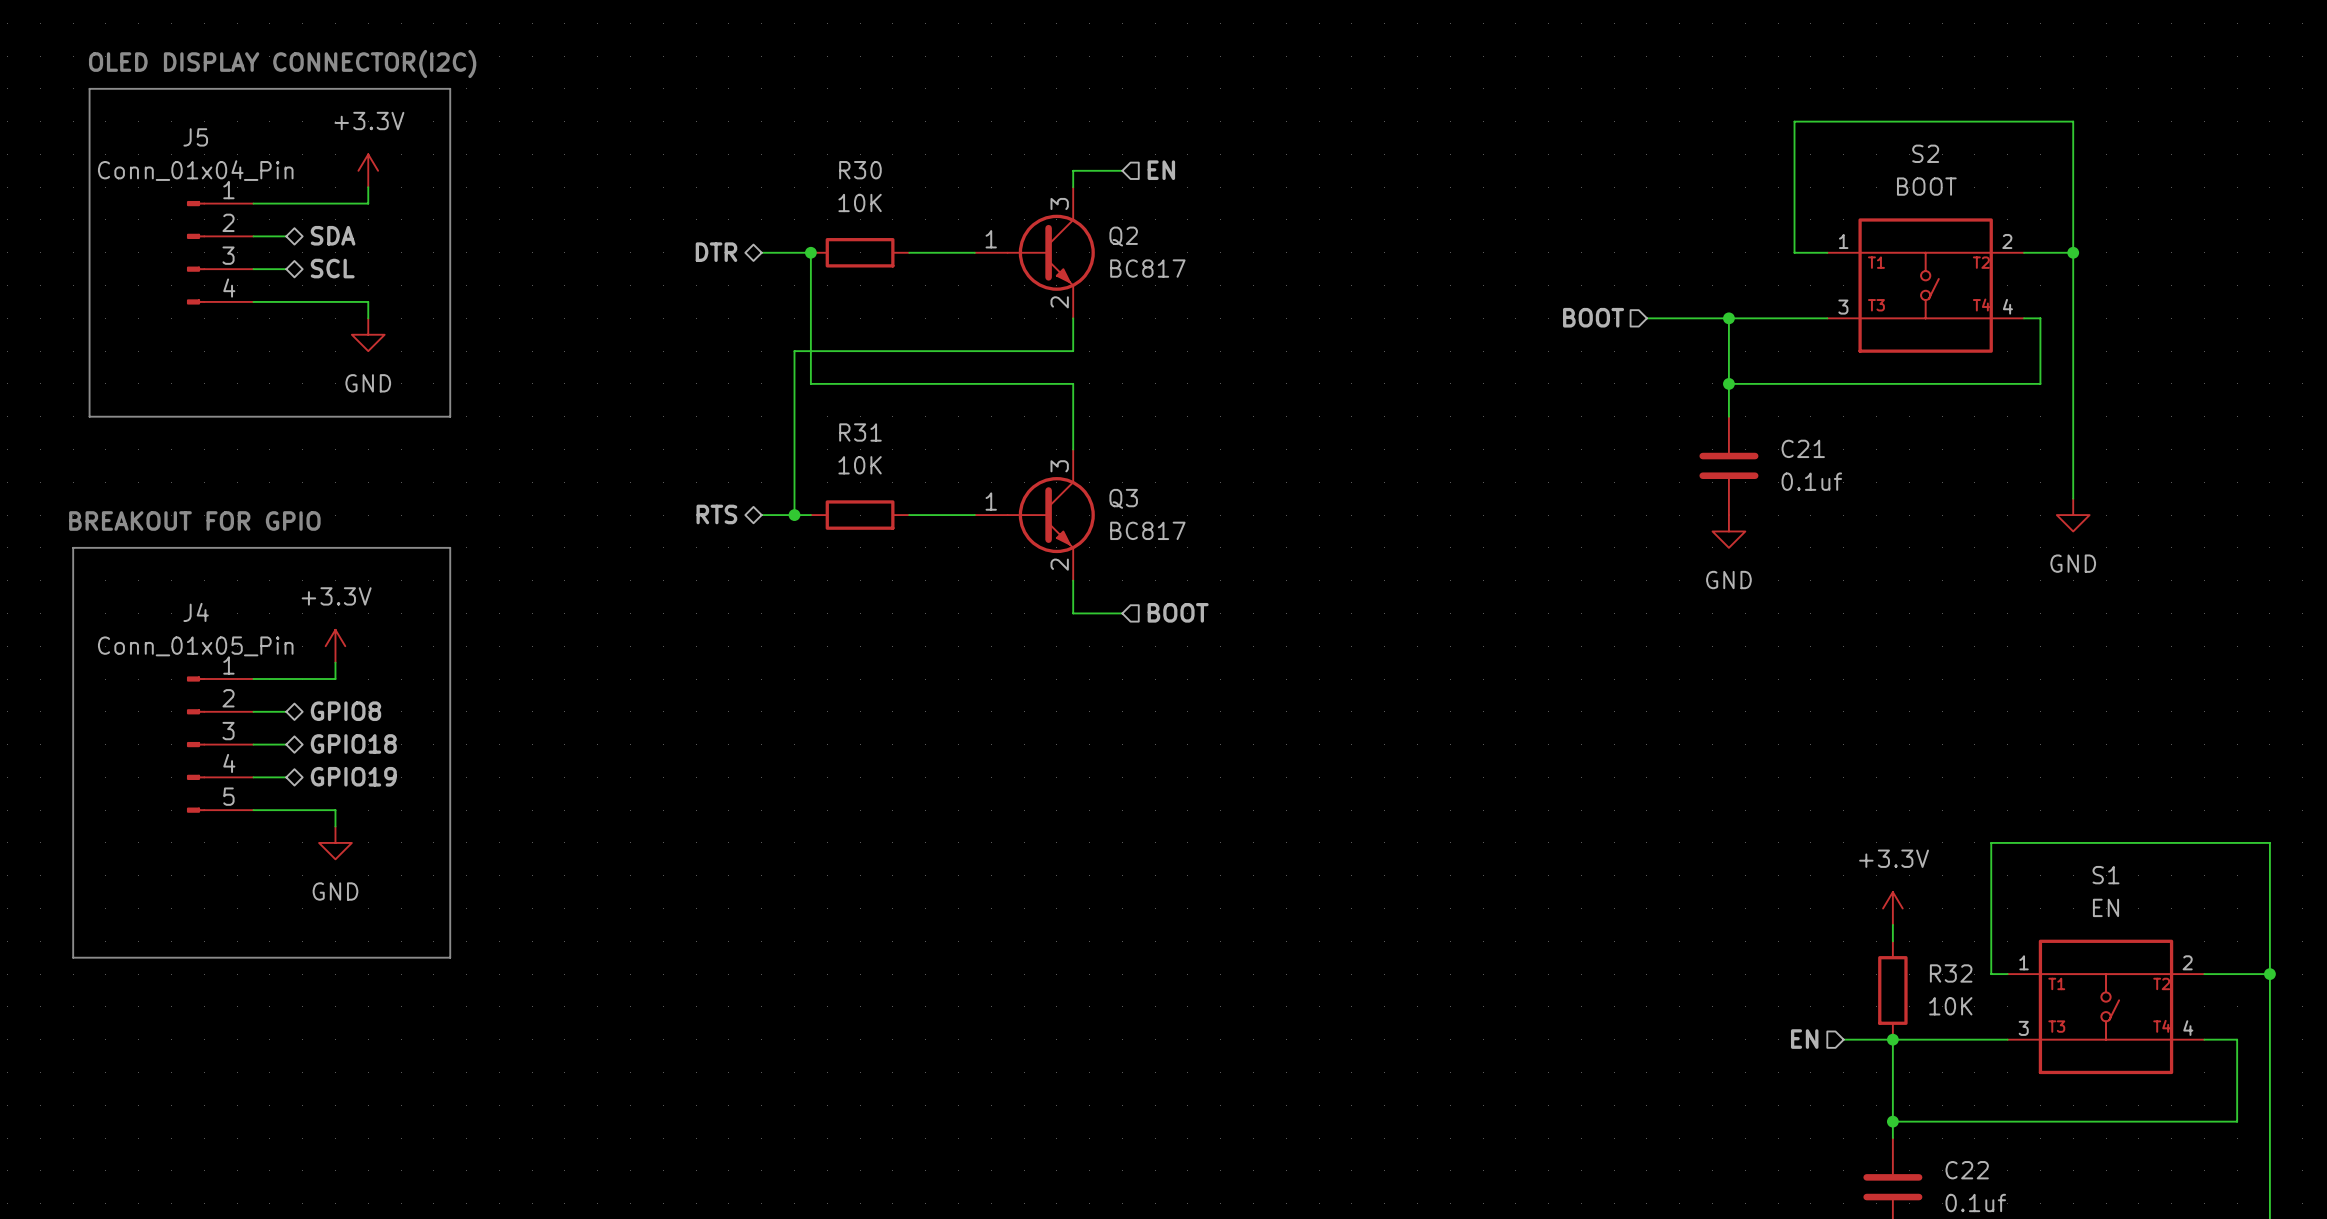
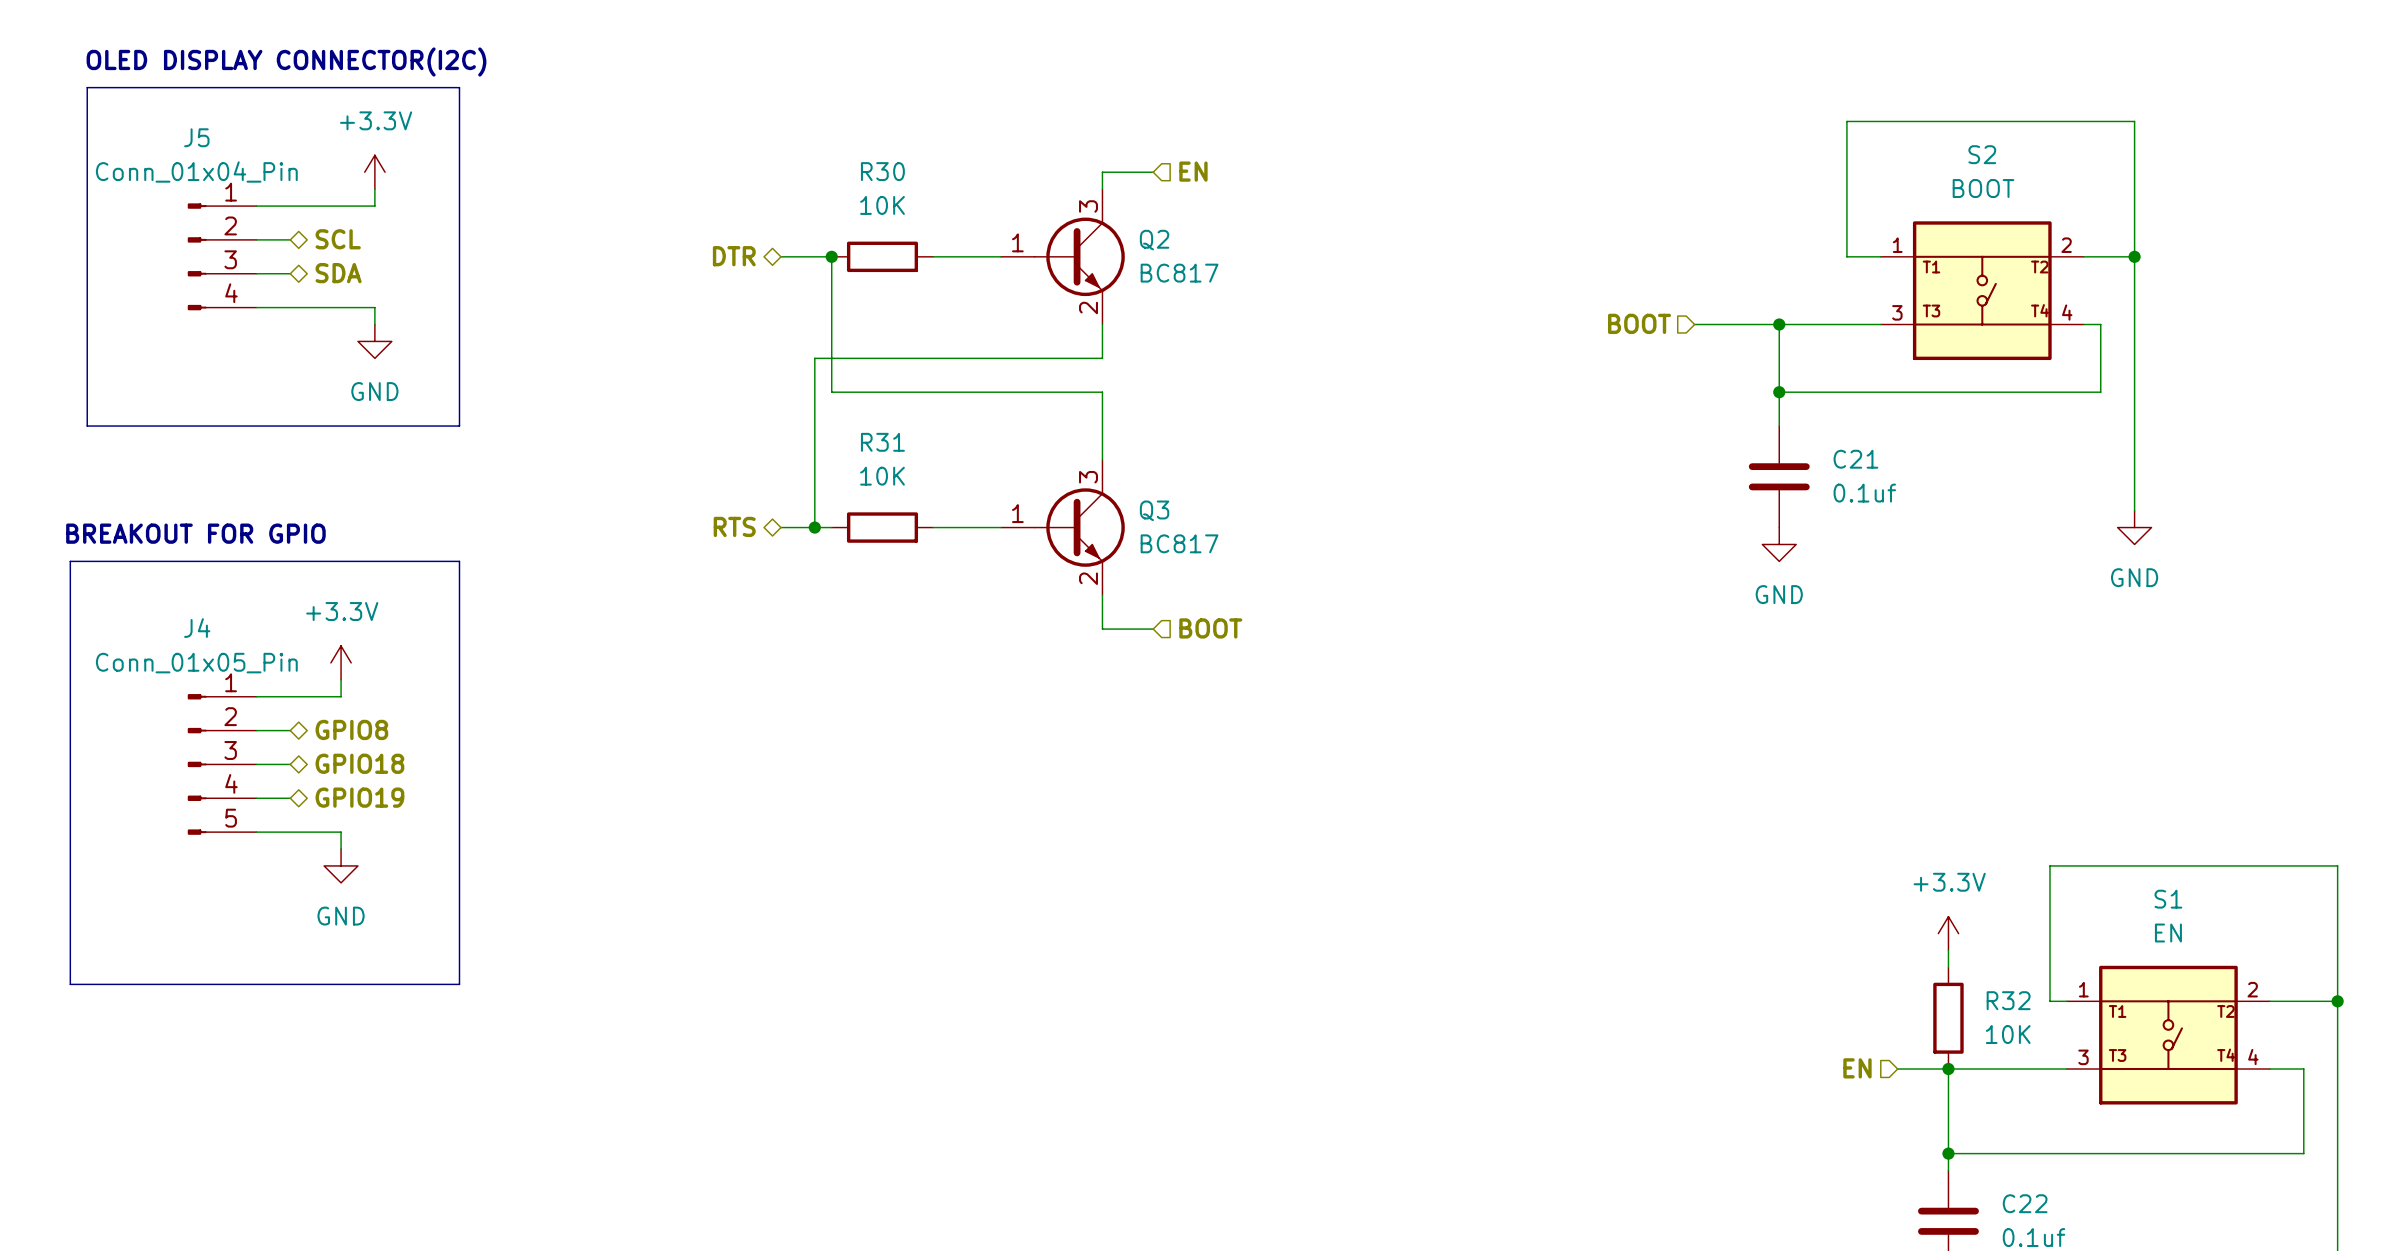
hierarchical label: SDA (333, 235) -> SCL (338, 239)
hierarchical label: SCL (332, 268) -> SDA (338, 273)

